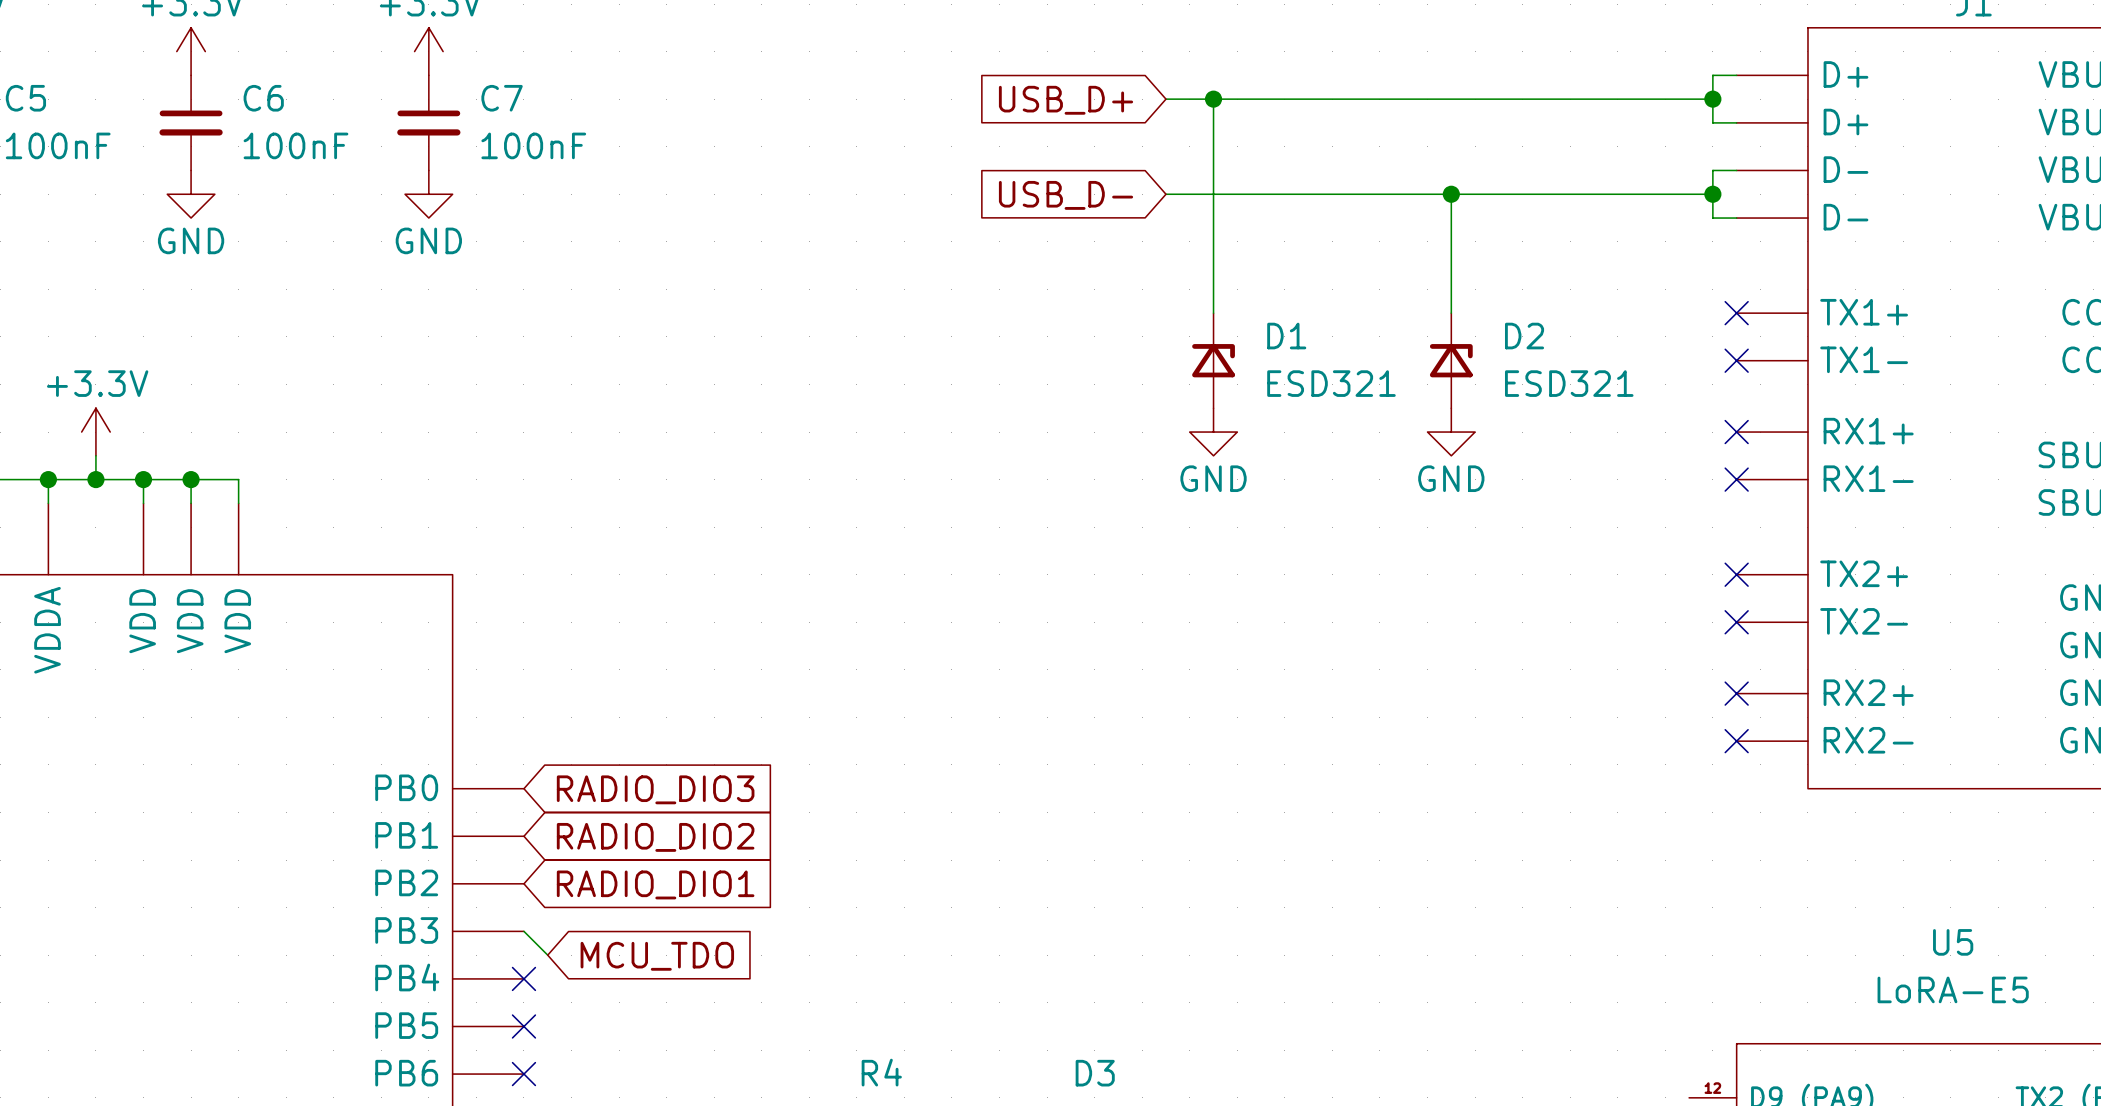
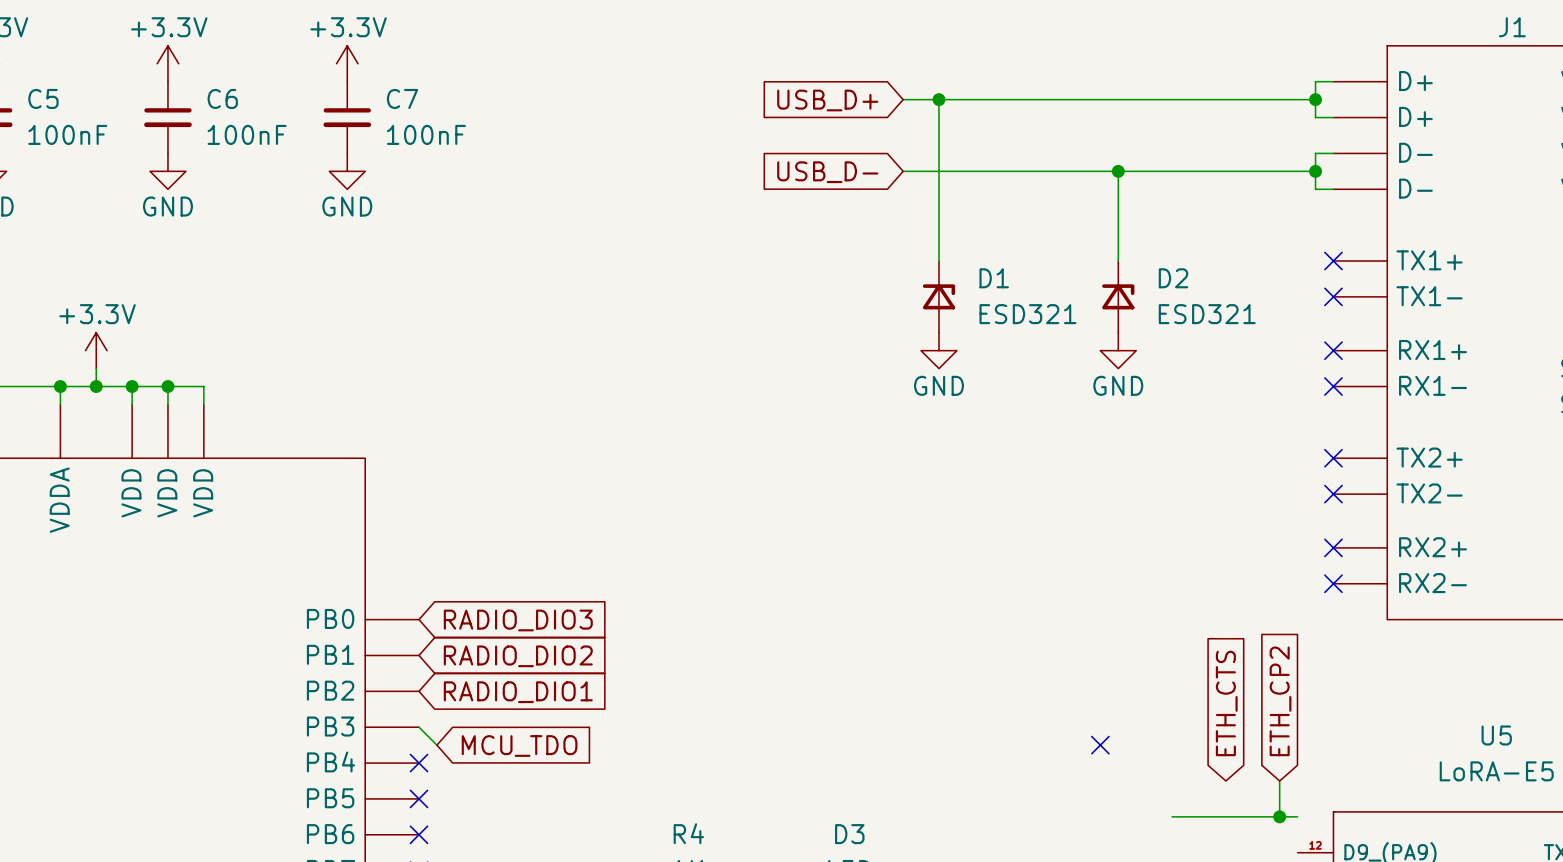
global label: none -> ETH_CP2 (1280, 701)
global label: none -> ETH_CTS (1226, 703)
no-connect mark: none -> (1100, 745)
wire: none -> (1279, 780) (1279, 816)
wire: none -> (1172, 816) (1297, 816)
junction: none -> (1279, 816)

